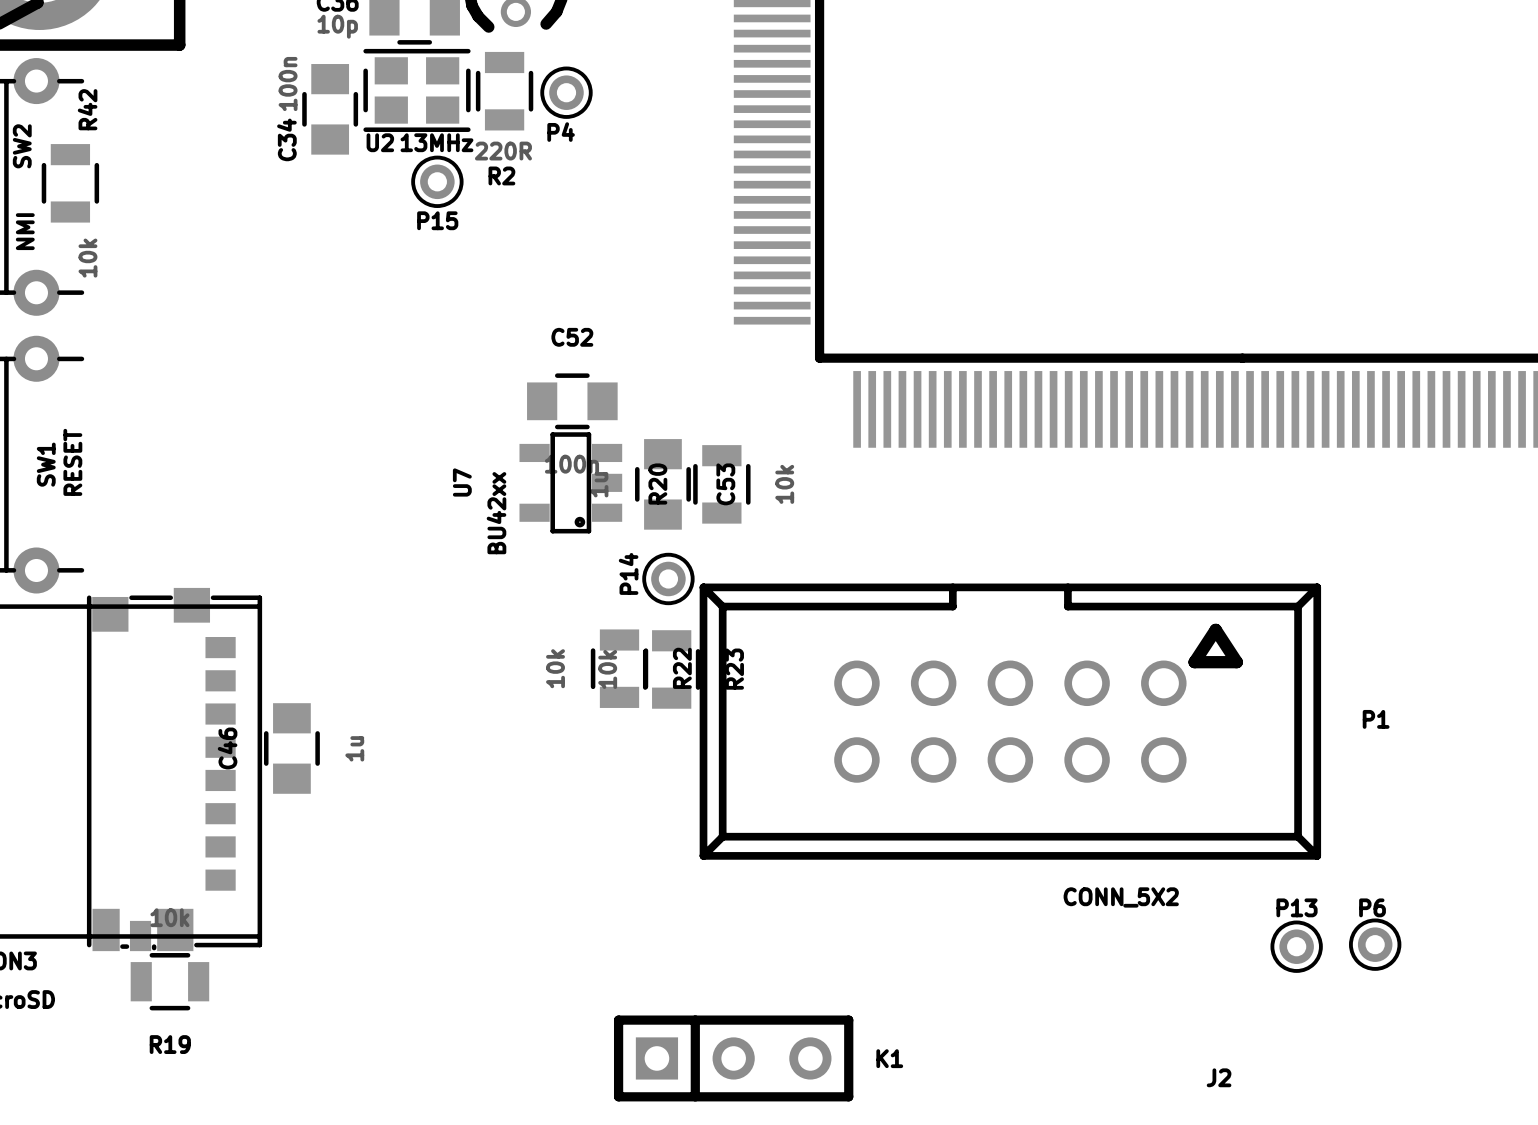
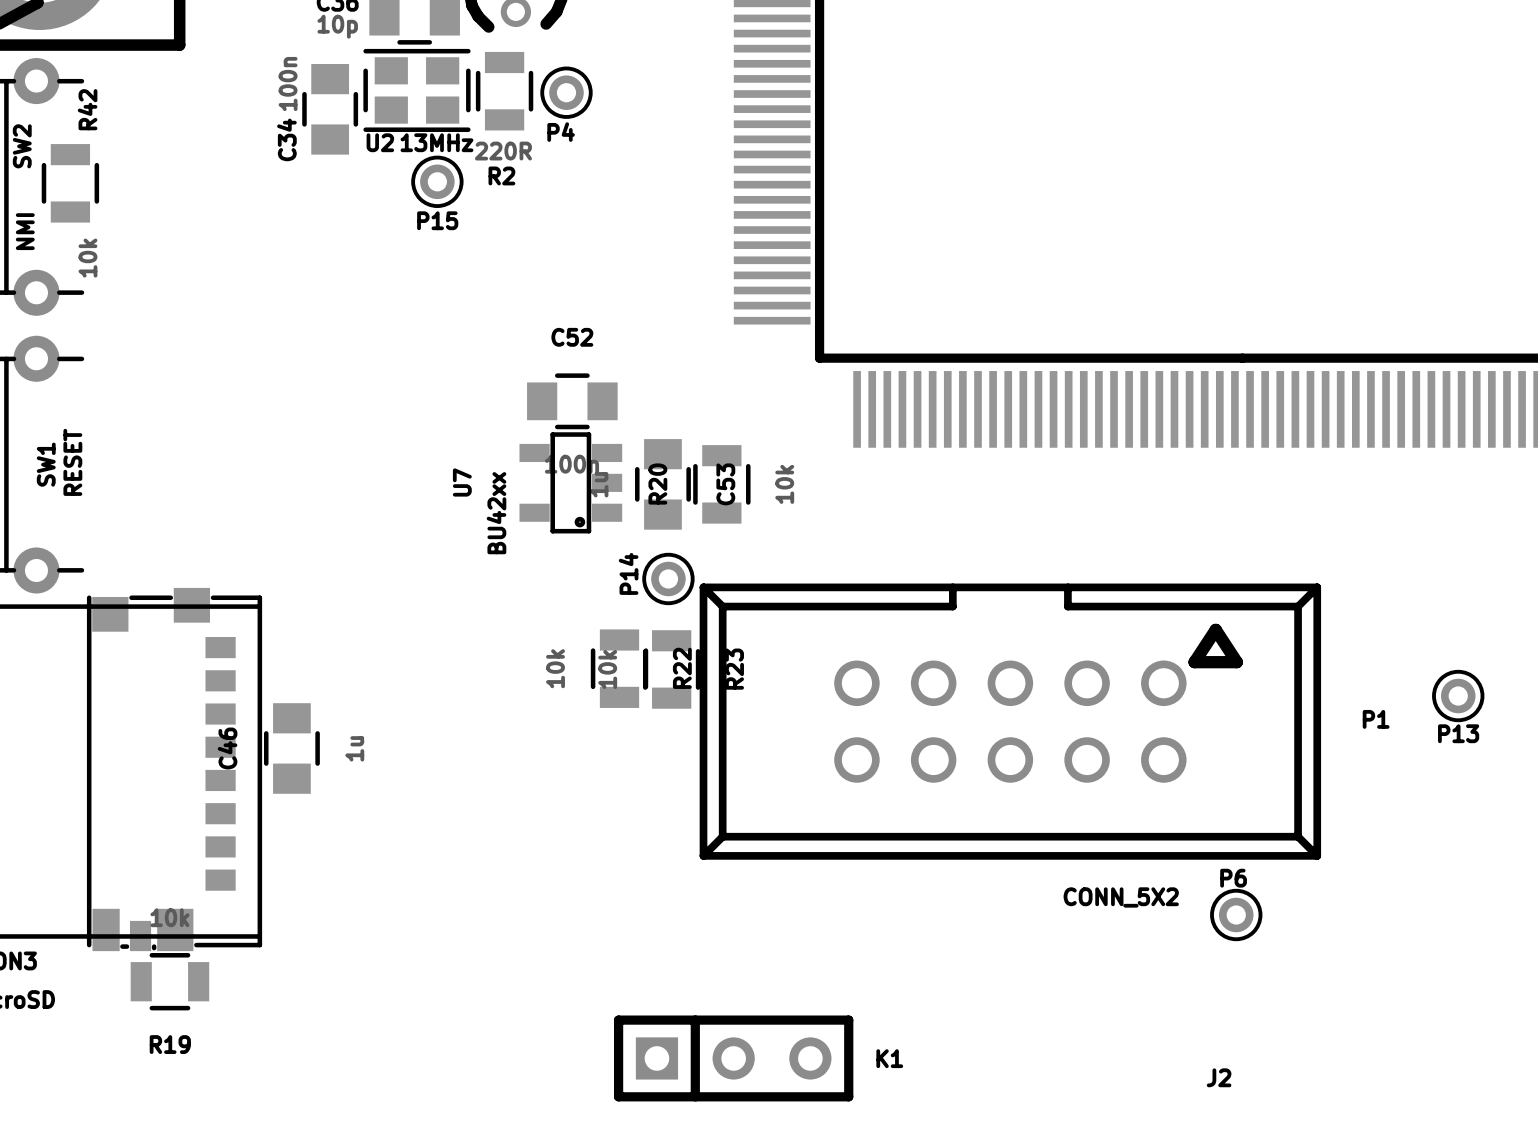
P13 name position: P13 (1297, 907) -> P13 (1458, 733)
P6 position: (1375, 944) -> (1236, 914)
P13 position: (1296, 946) -> (1458, 696)

